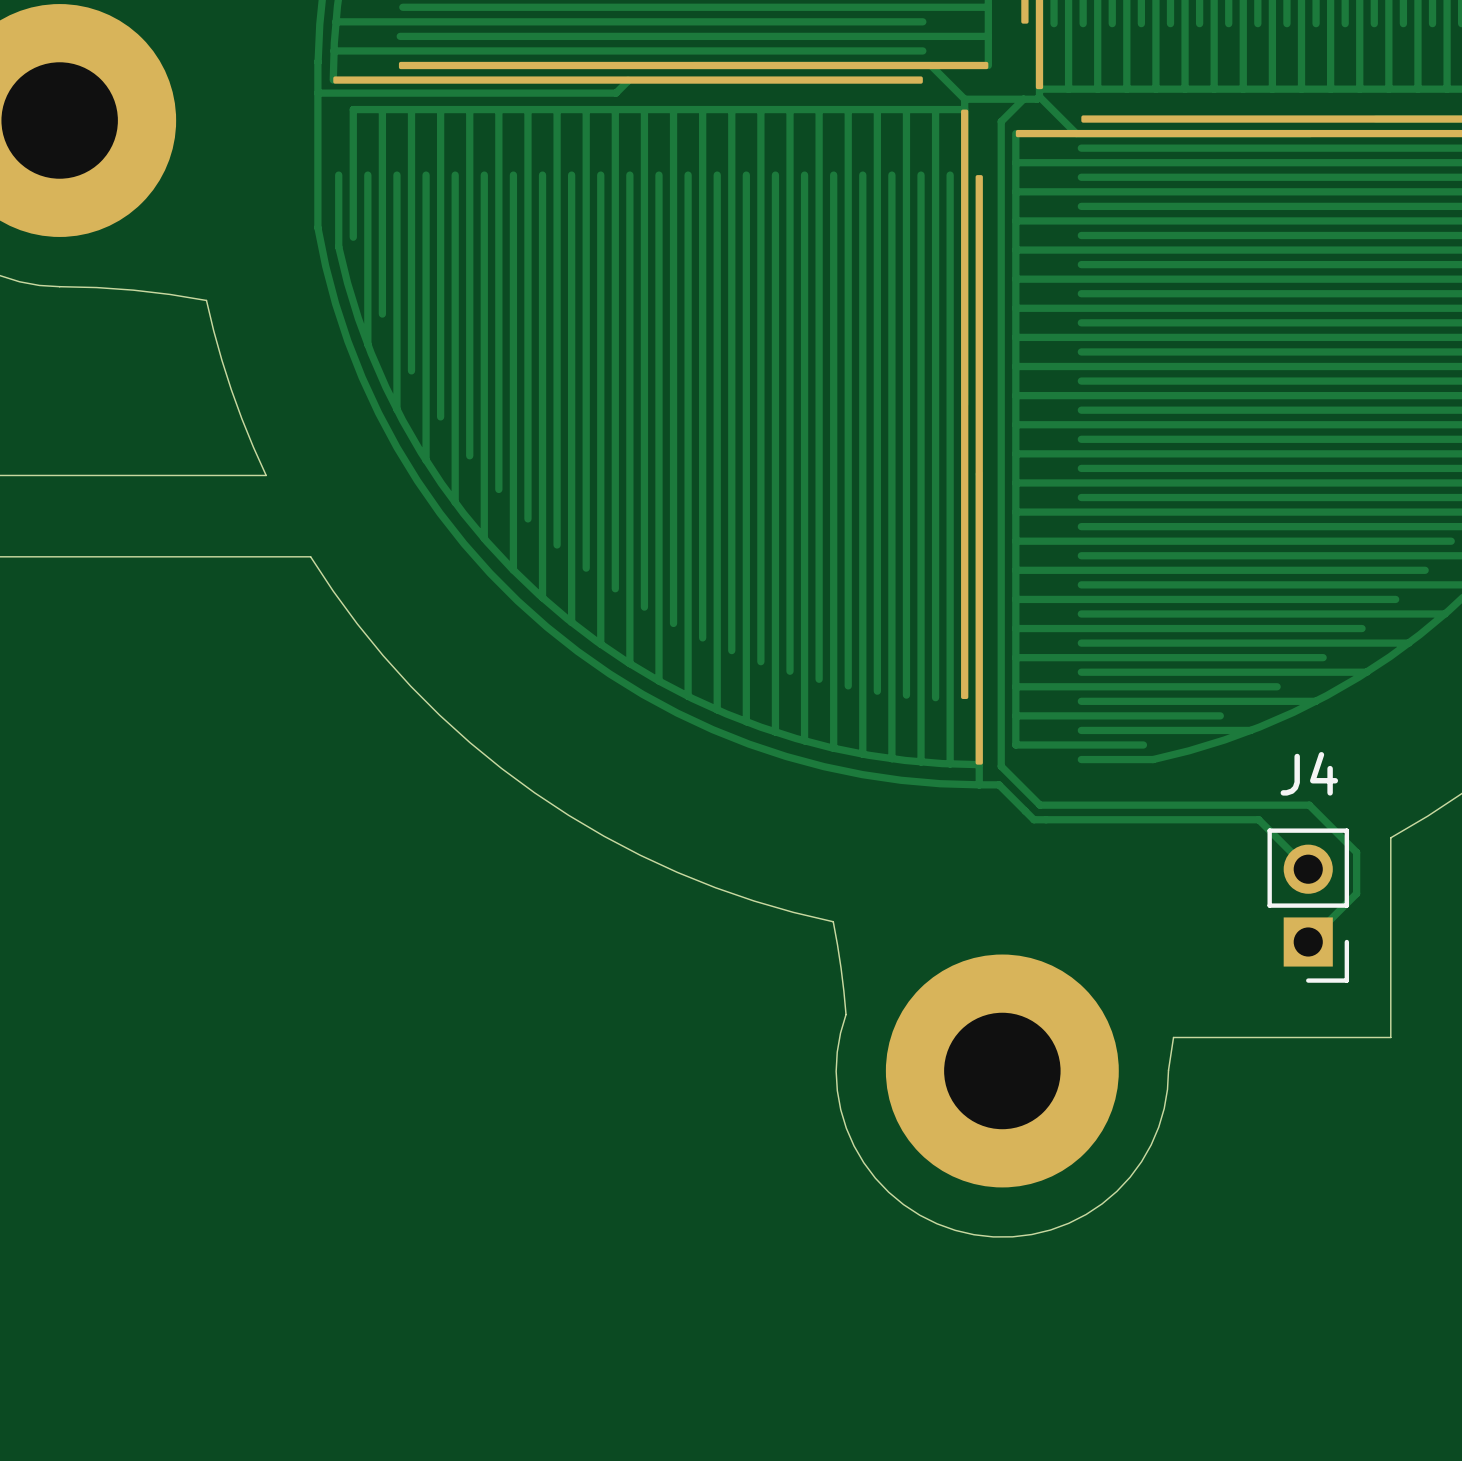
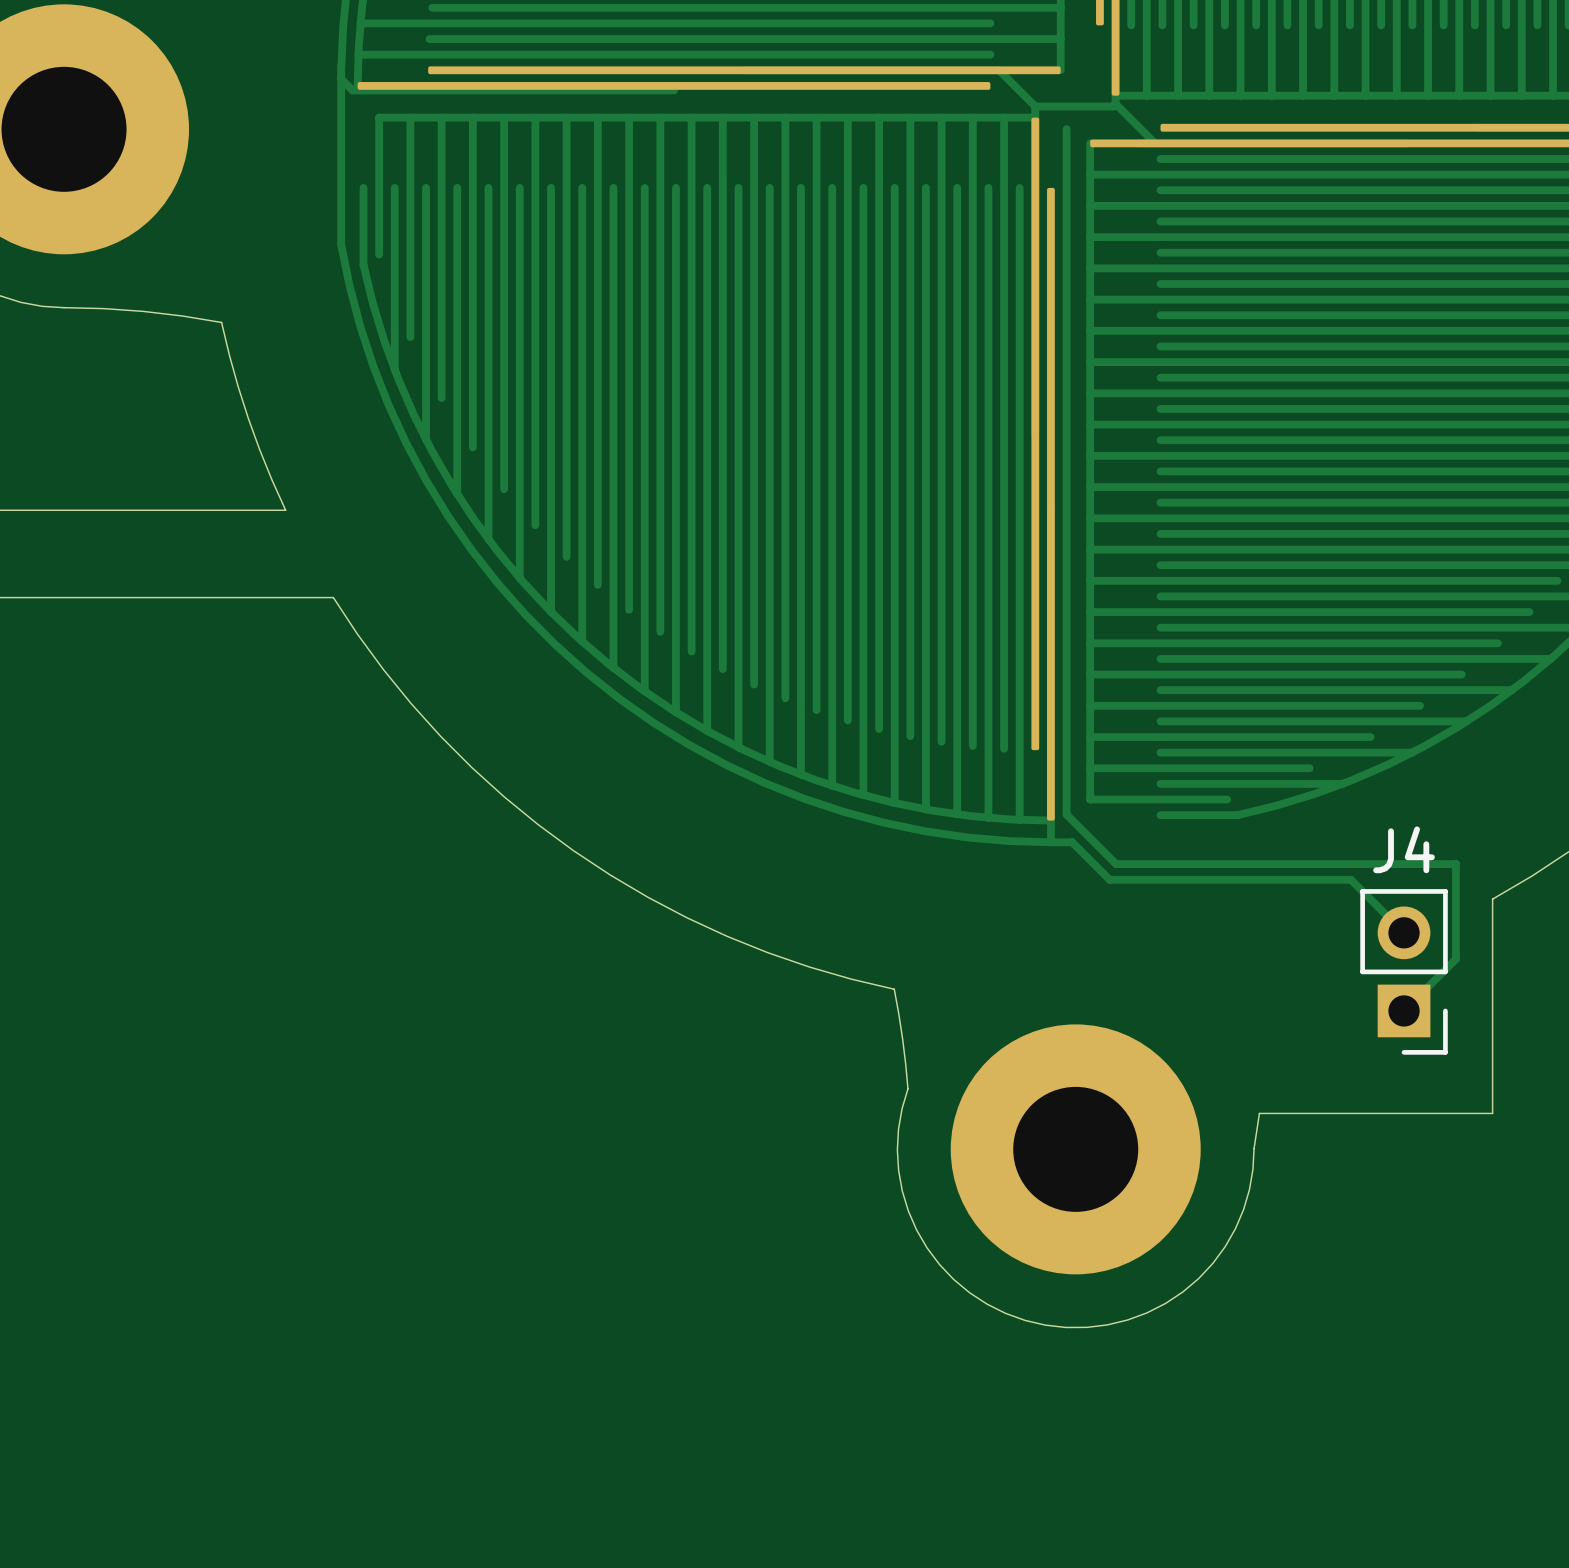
track: none -> (340, 78) (352, 90) (674, 90)
track: (628, 80) (616, 93) (317, 93) -> none
track: (1023, 99) (1001, 121) (1001, 766) -> (1066, 129) (1066, 814) (1074, 822)
J4 name position: J4 (1309, 773) -> J4 (1404, 849)
track: (1309, 805) (1356, 852) -> (1405, 864) (1455, 864) (1455, 914)

